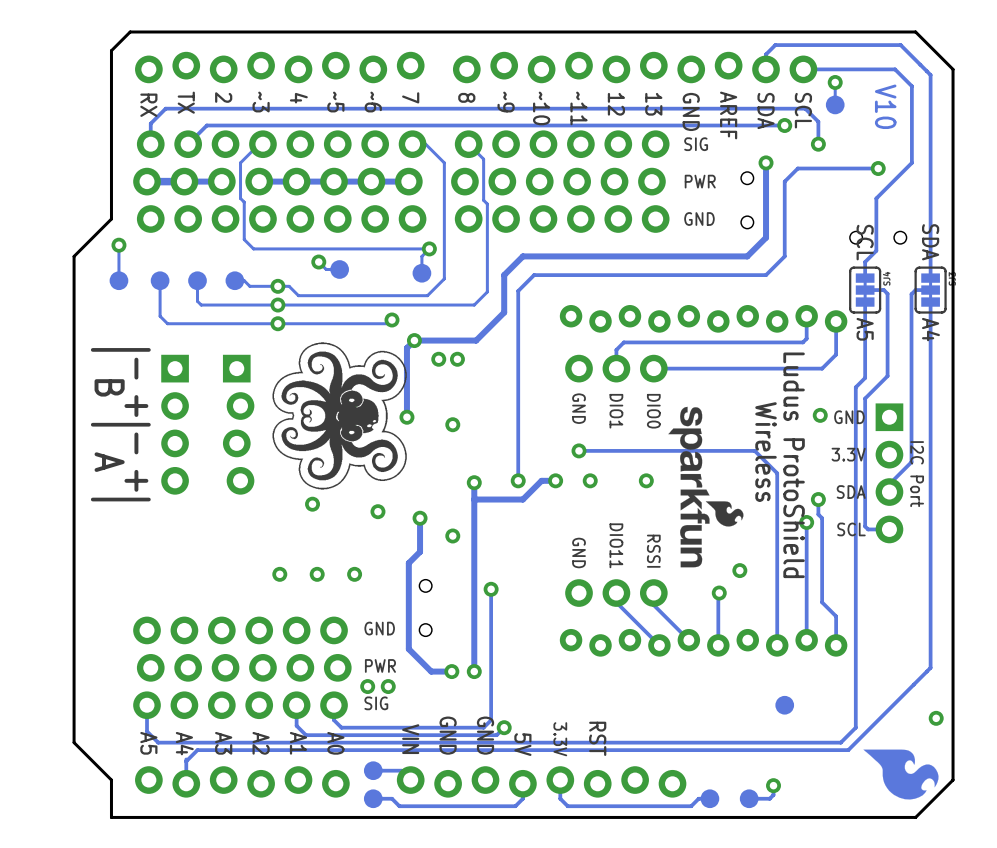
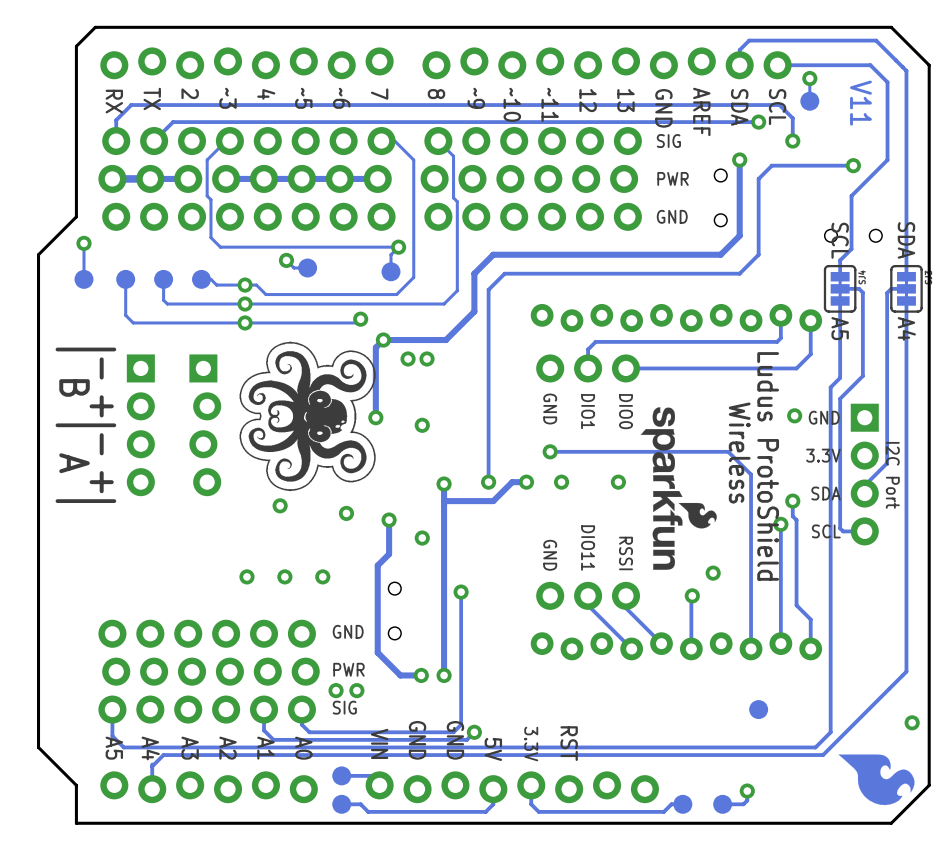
text: V10 (885, 106) -> V11 (860, 103)

